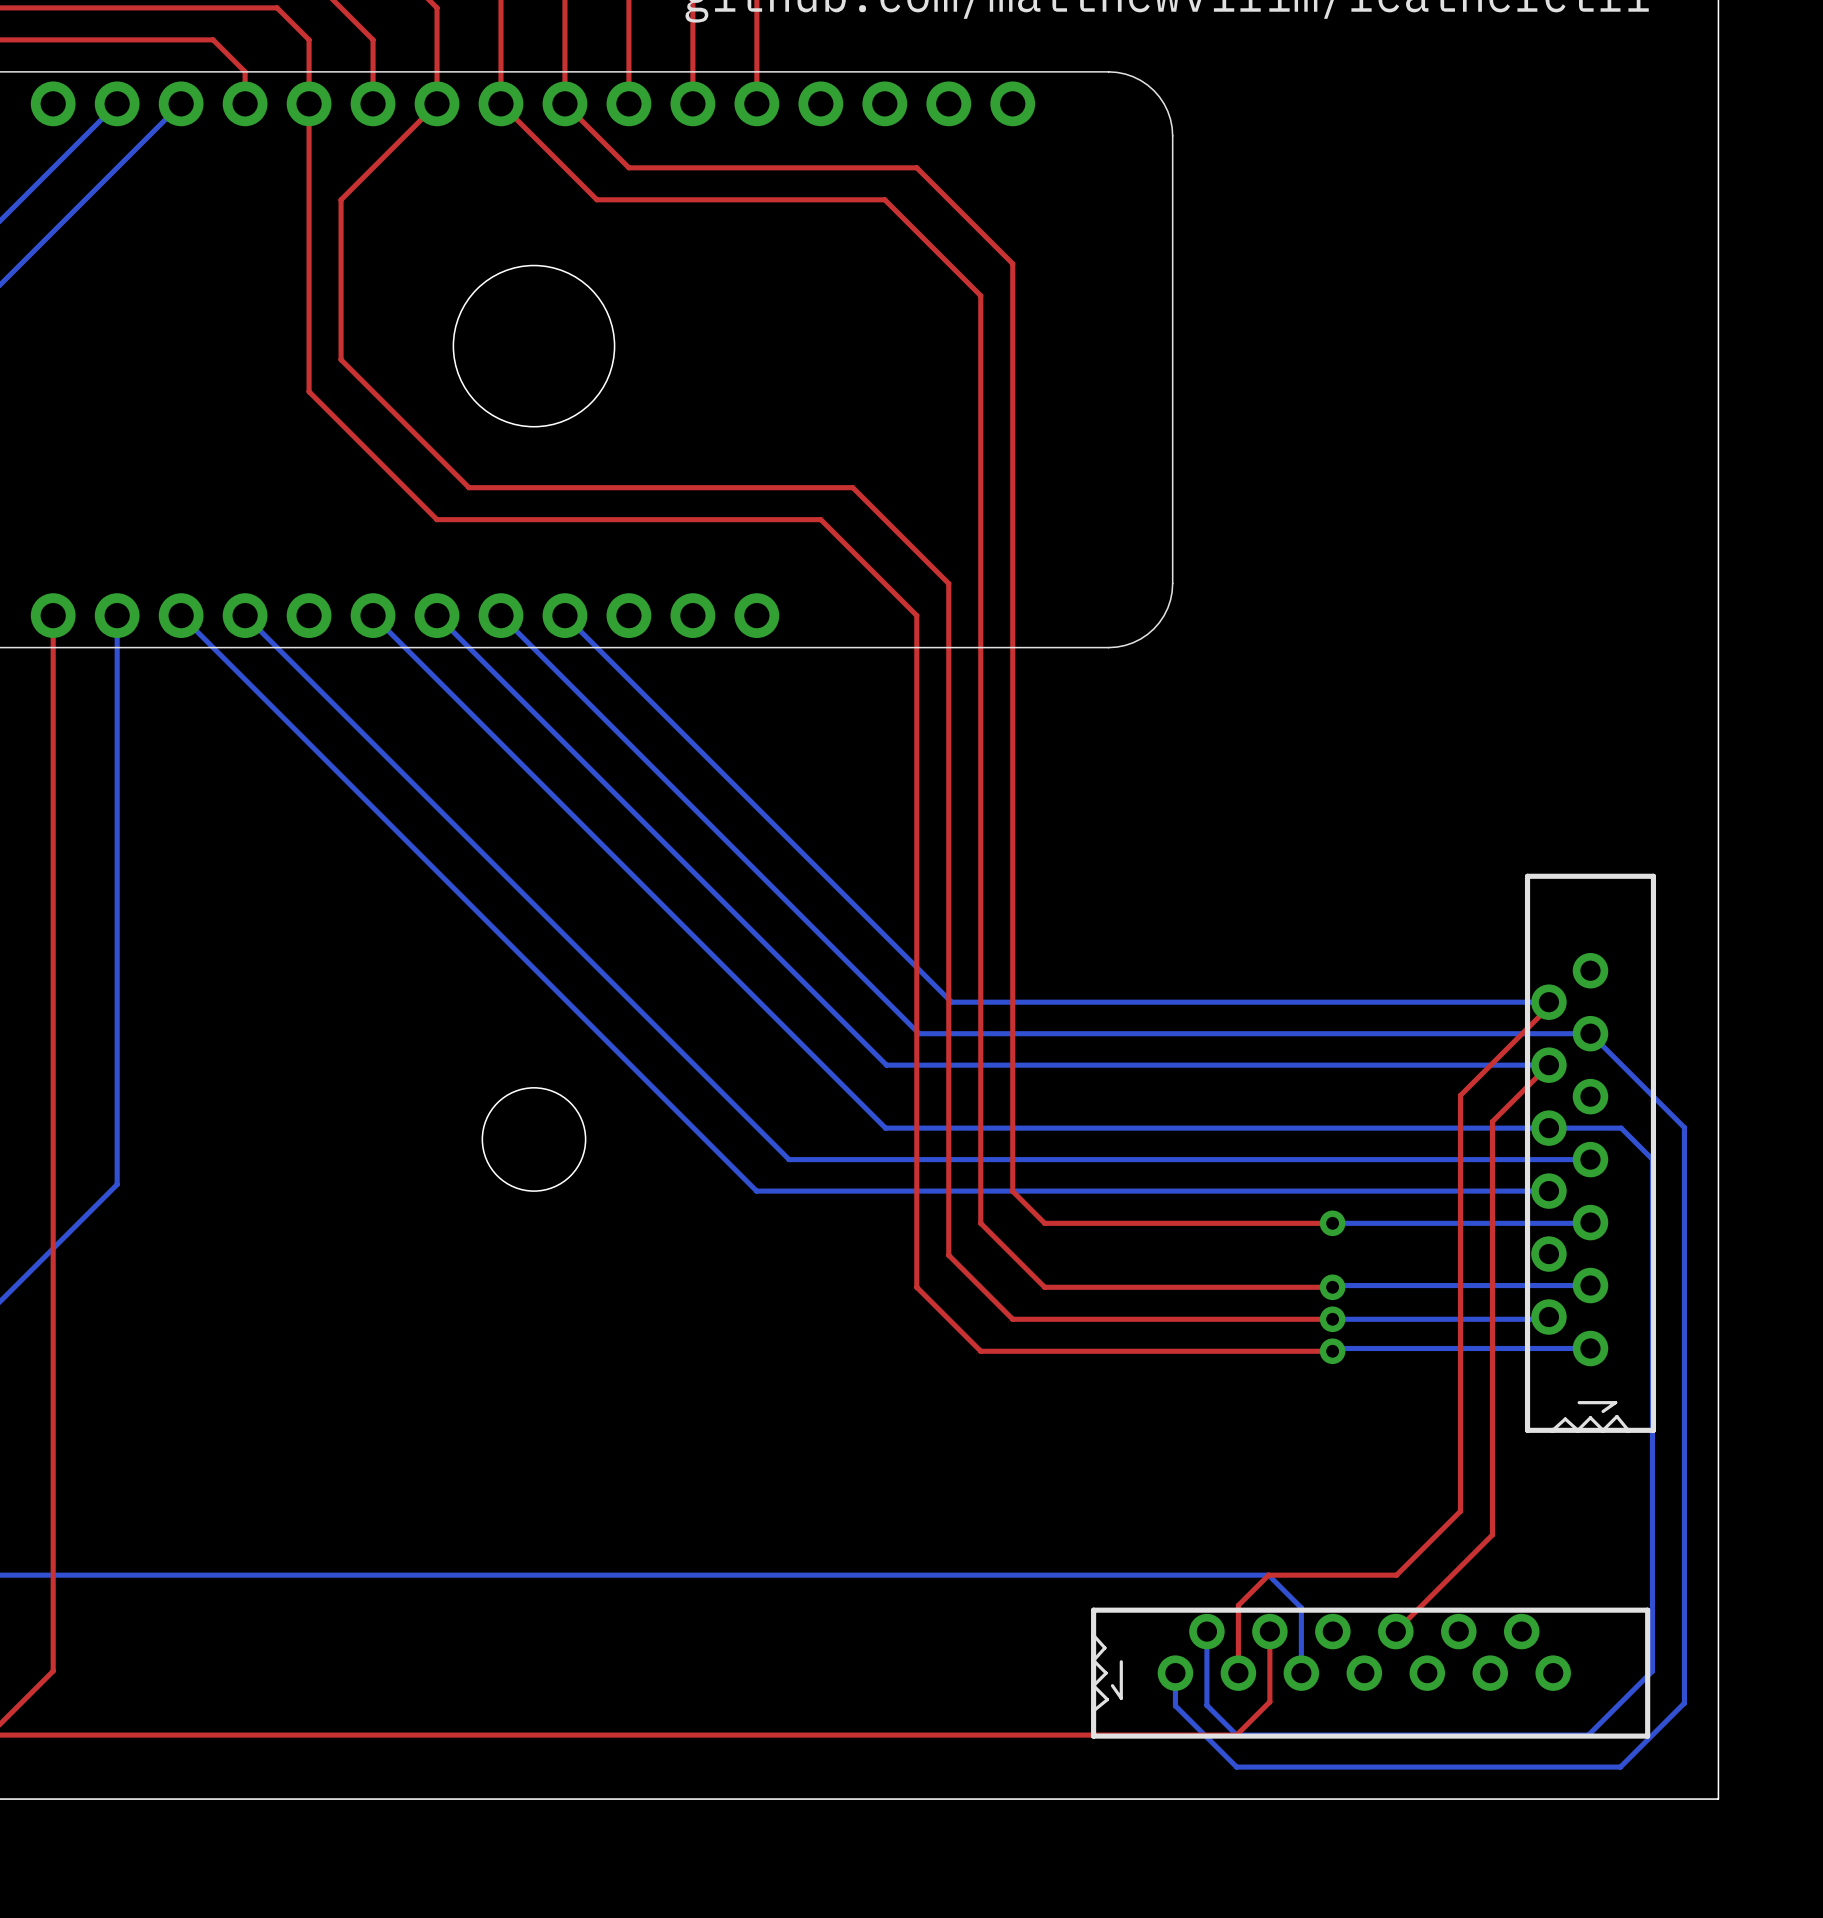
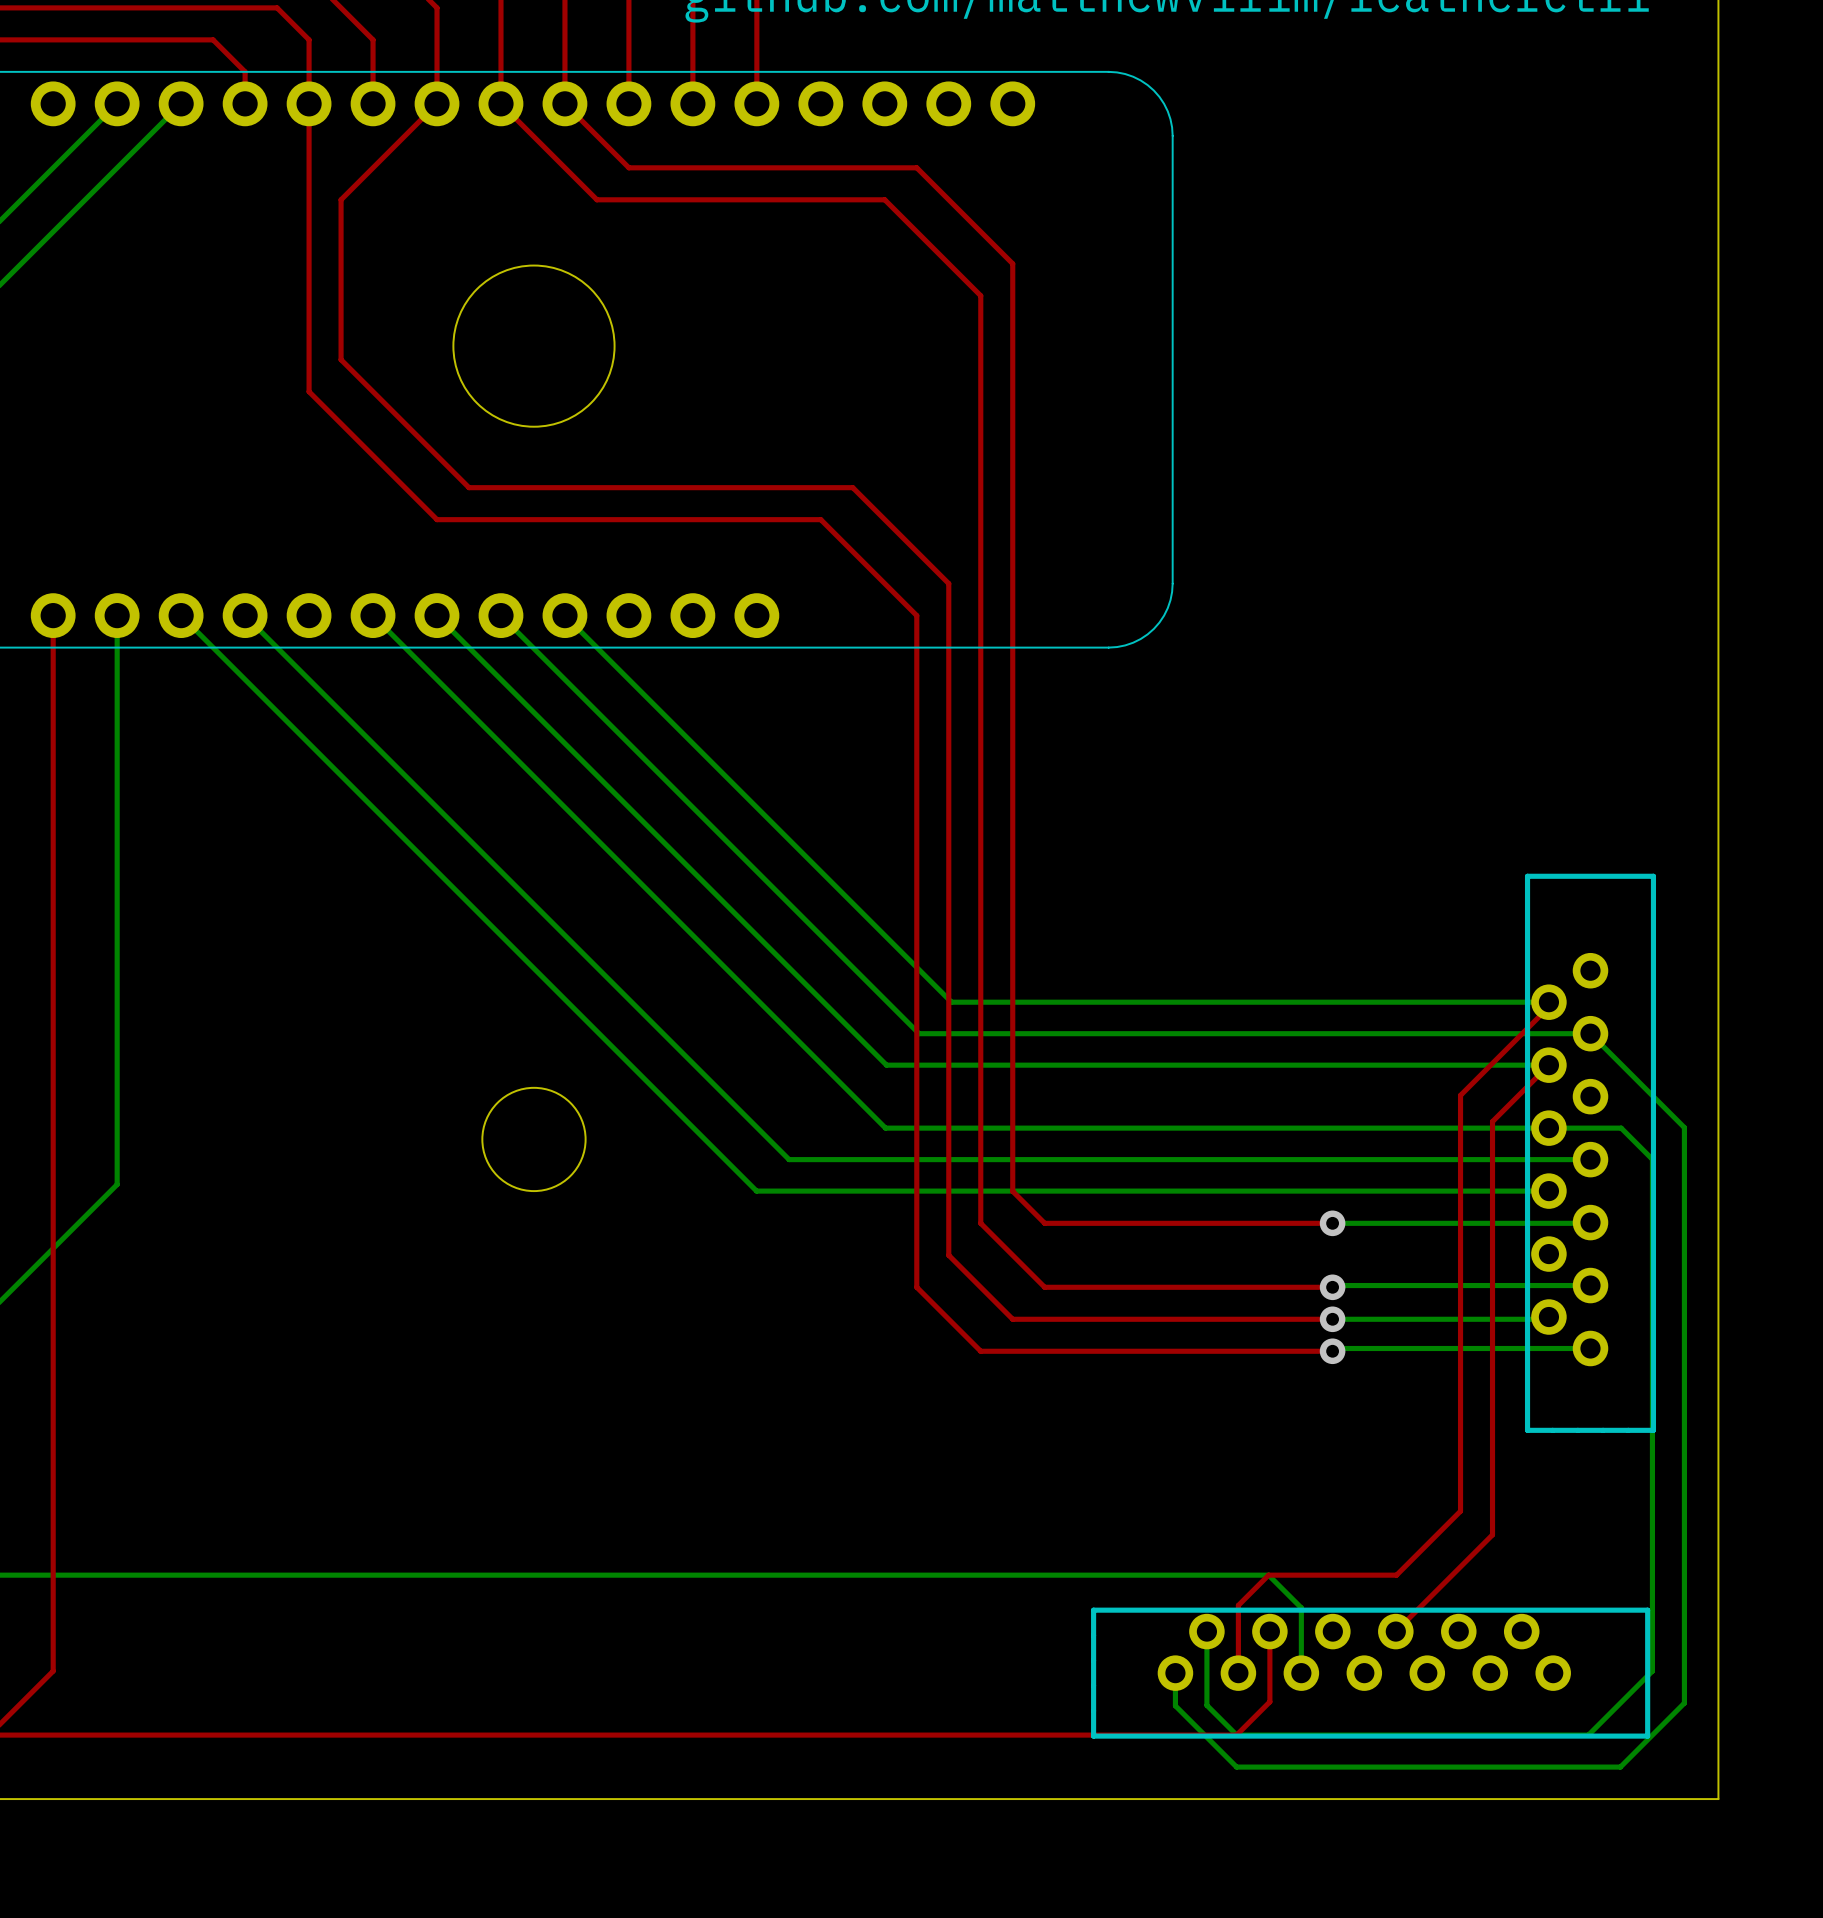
part footprint: [1524, 873, 1657, 1433] -> [1524, 873, 1657, 1433]
part footprint: [1091, 1607, 1651, 1739] -> [1091, 1607, 1651, 1739]

